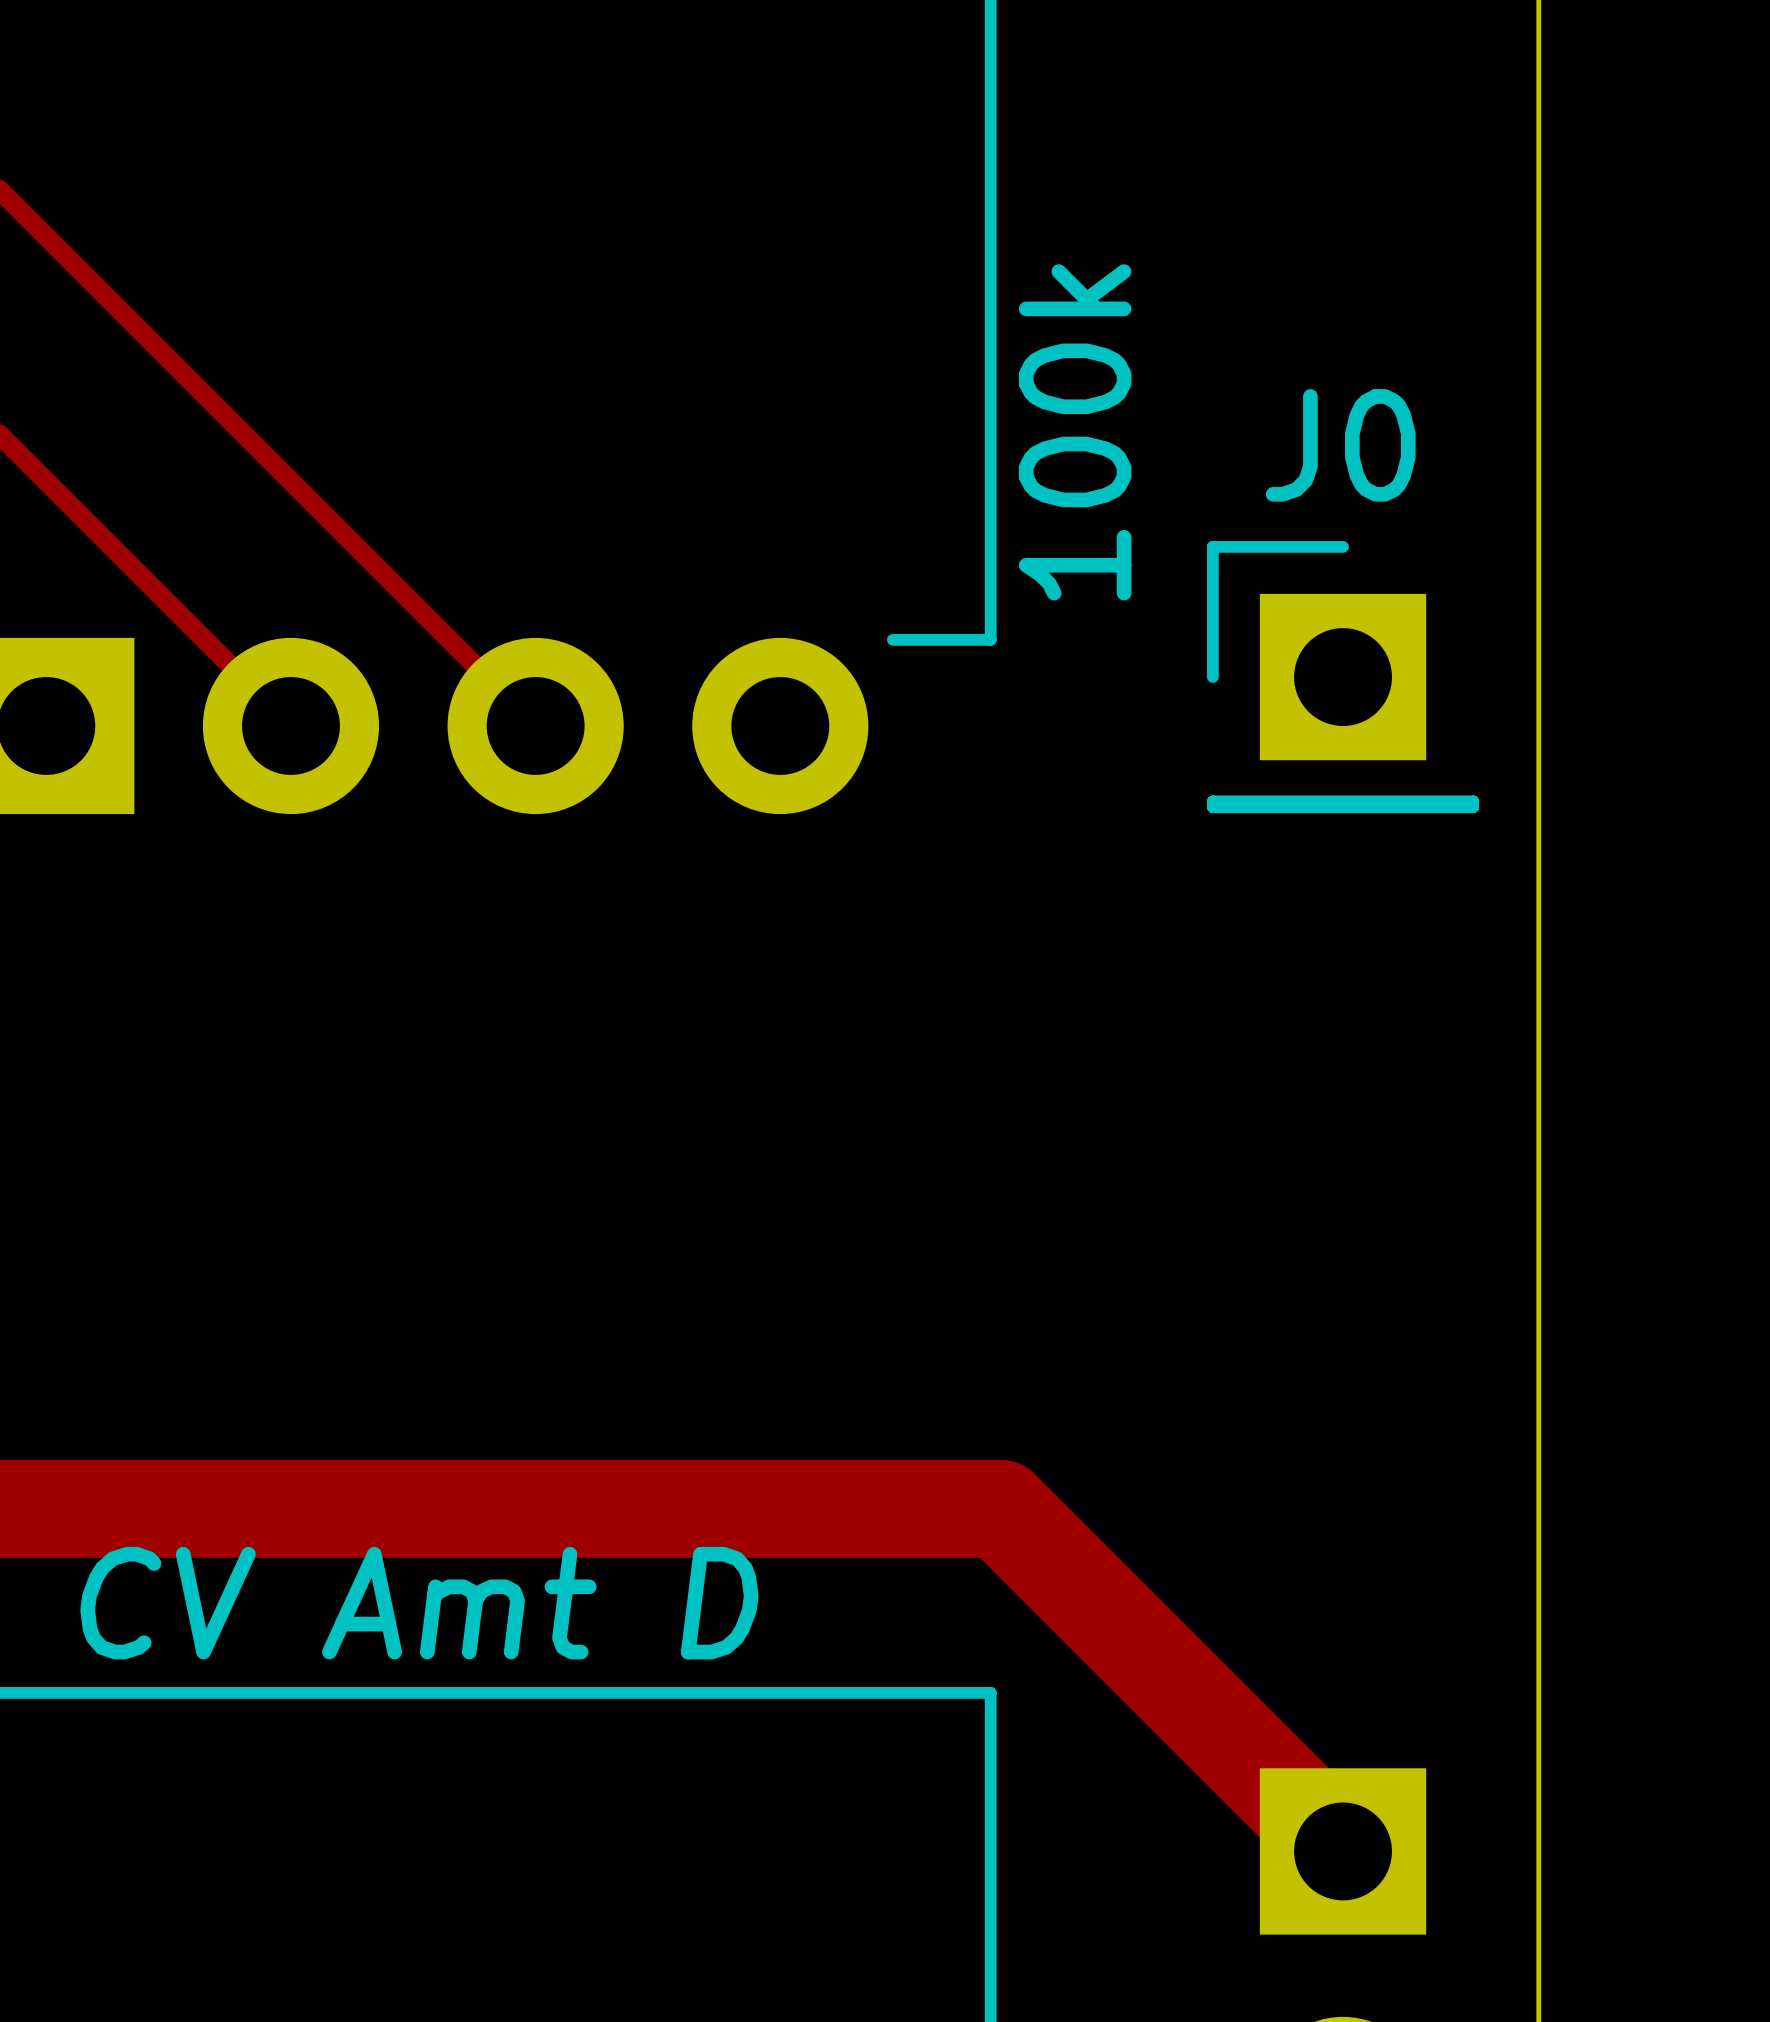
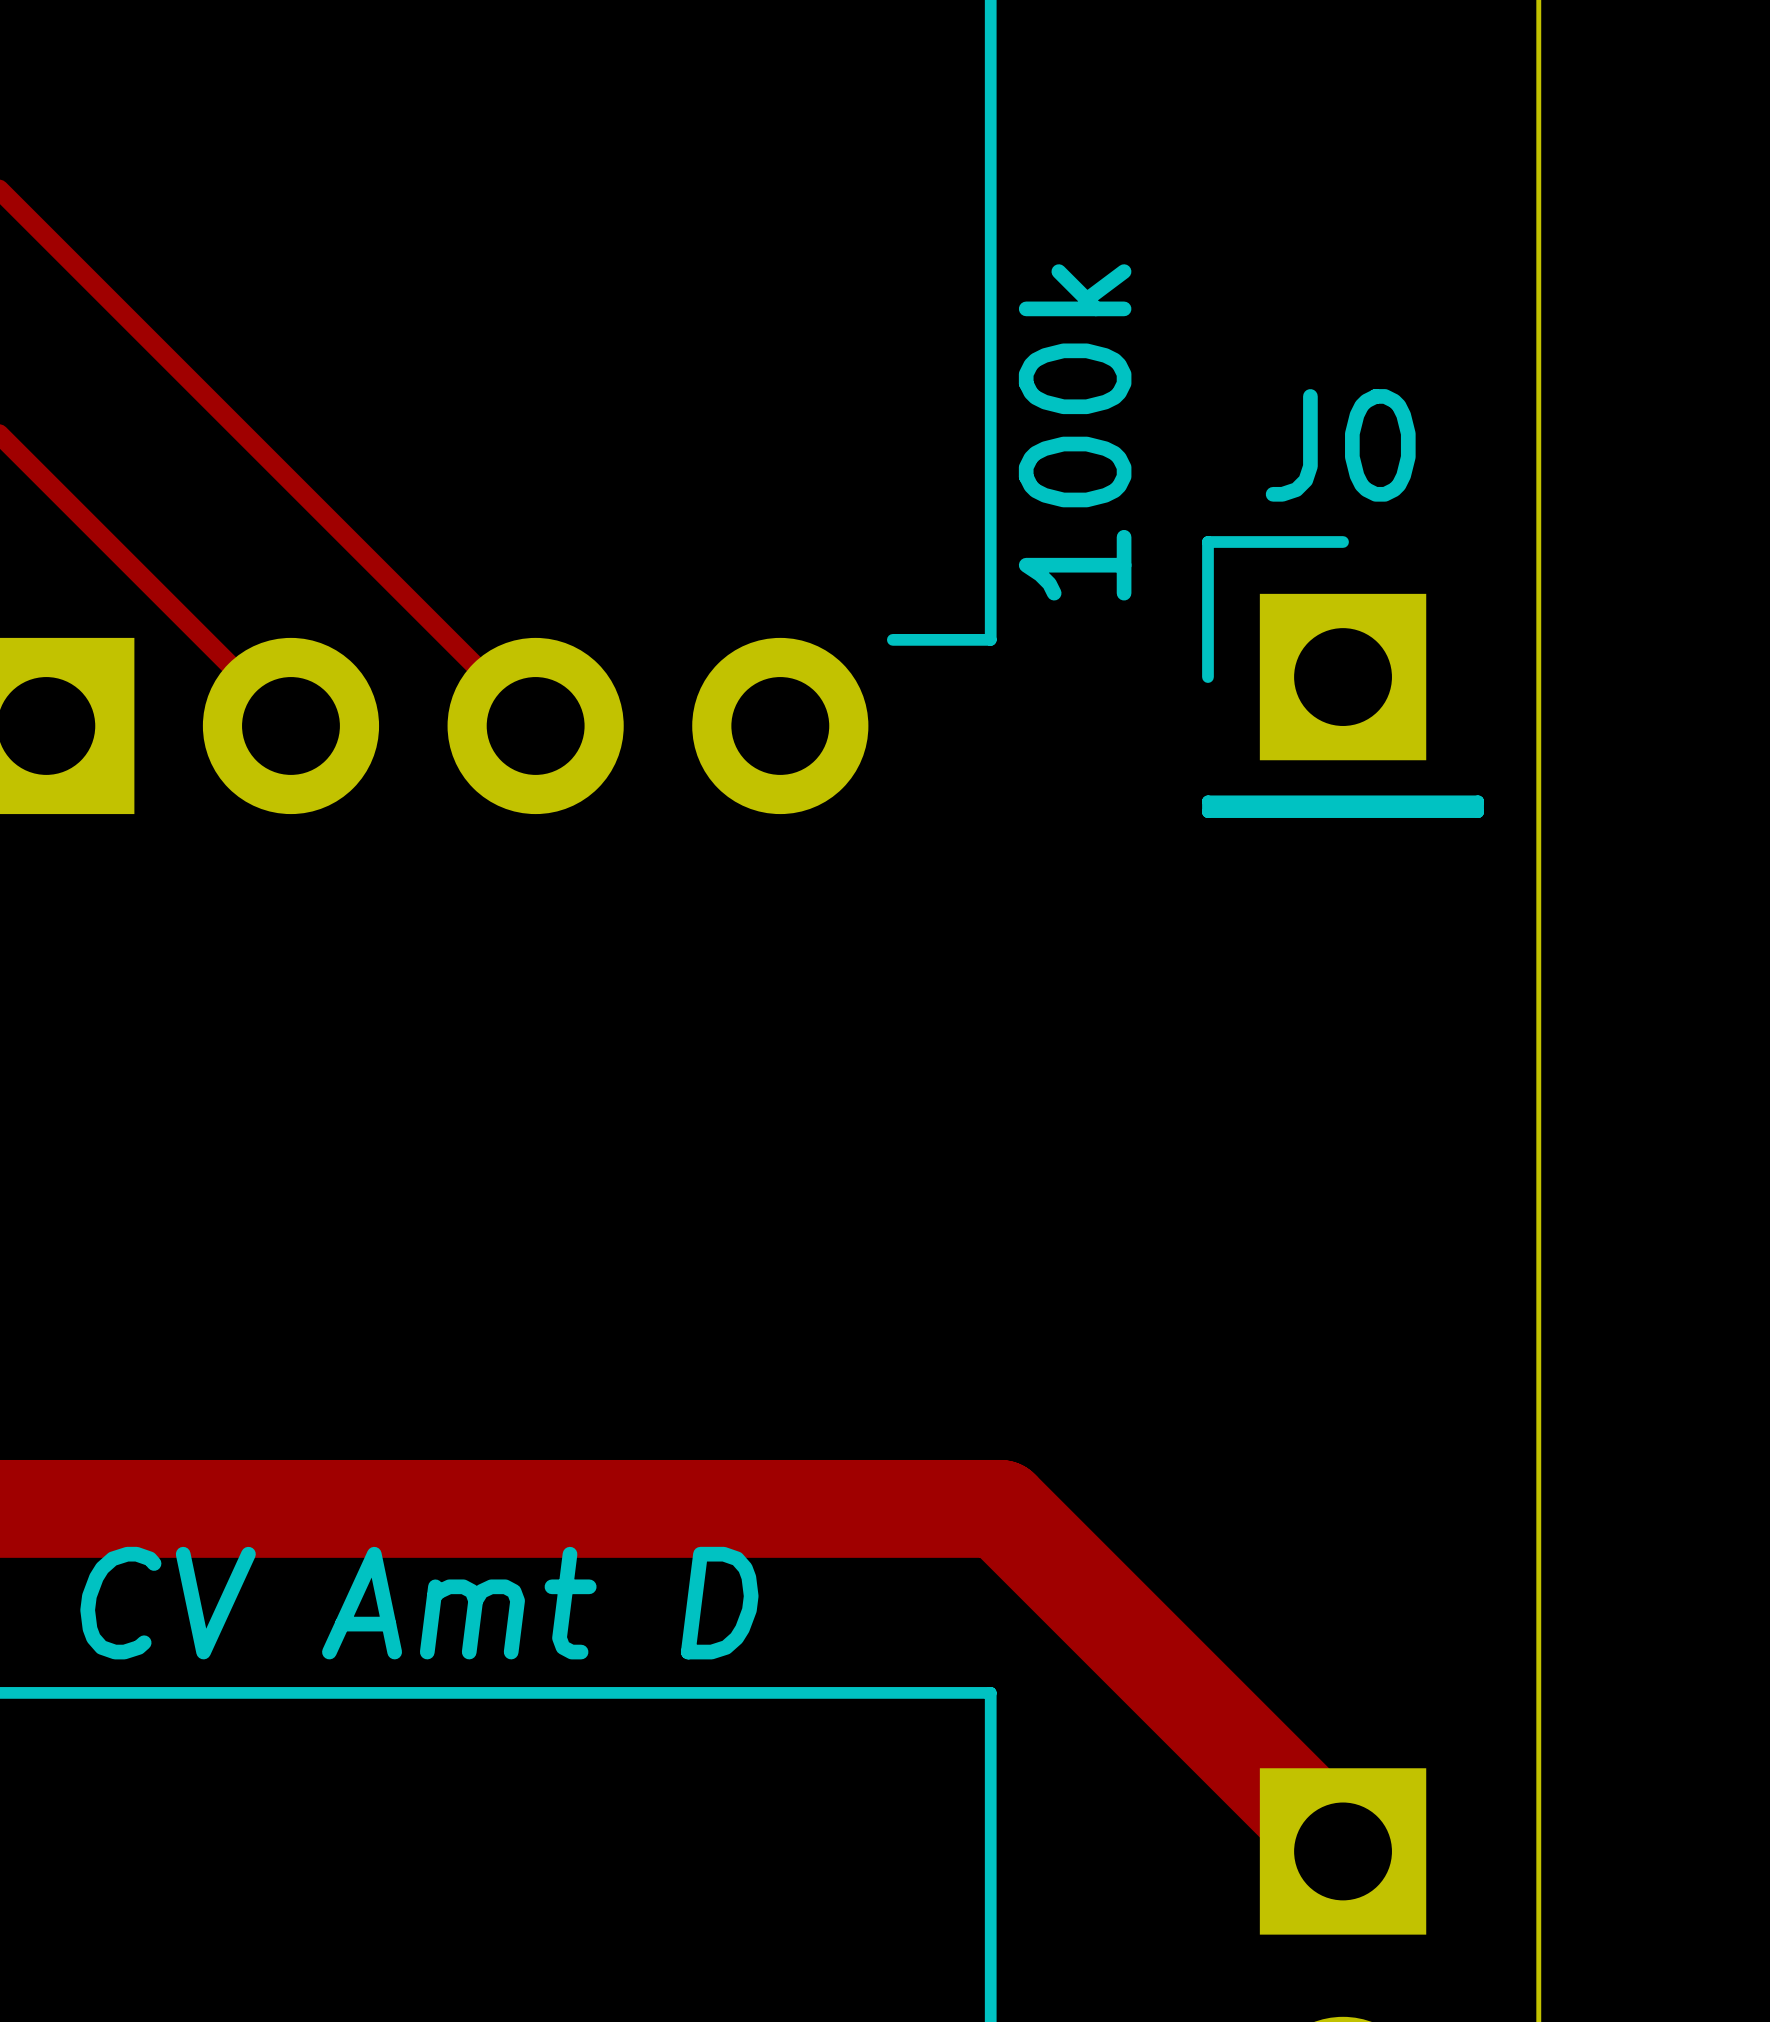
J0 footprint: [1207, 541, 1480, 814] -> [1202, 536, 1484, 818]

